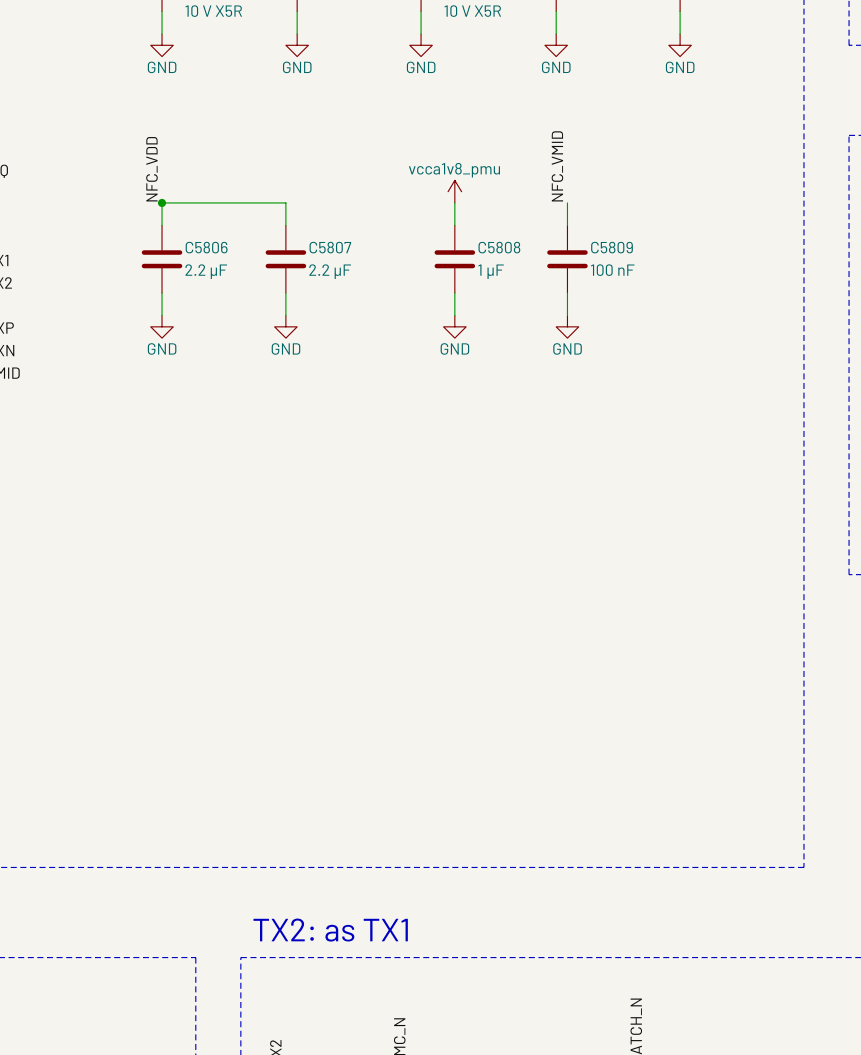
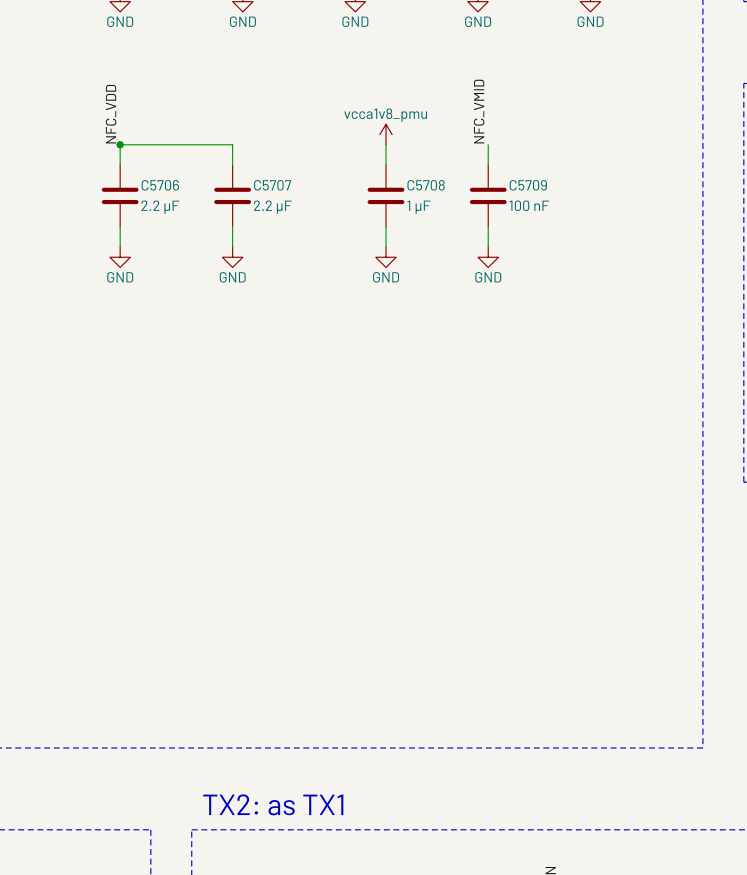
C5806 name: C5806 (206, 247) -> C5706 (160, 185)
C5807 name: C5807 (330, 247) -> C5707 (272, 185)
C5808 name: C5808 (499, 247) -> C5708 (426, 185)
C5809 name: C5809 (611, 247) -> C5709 (528, 185)

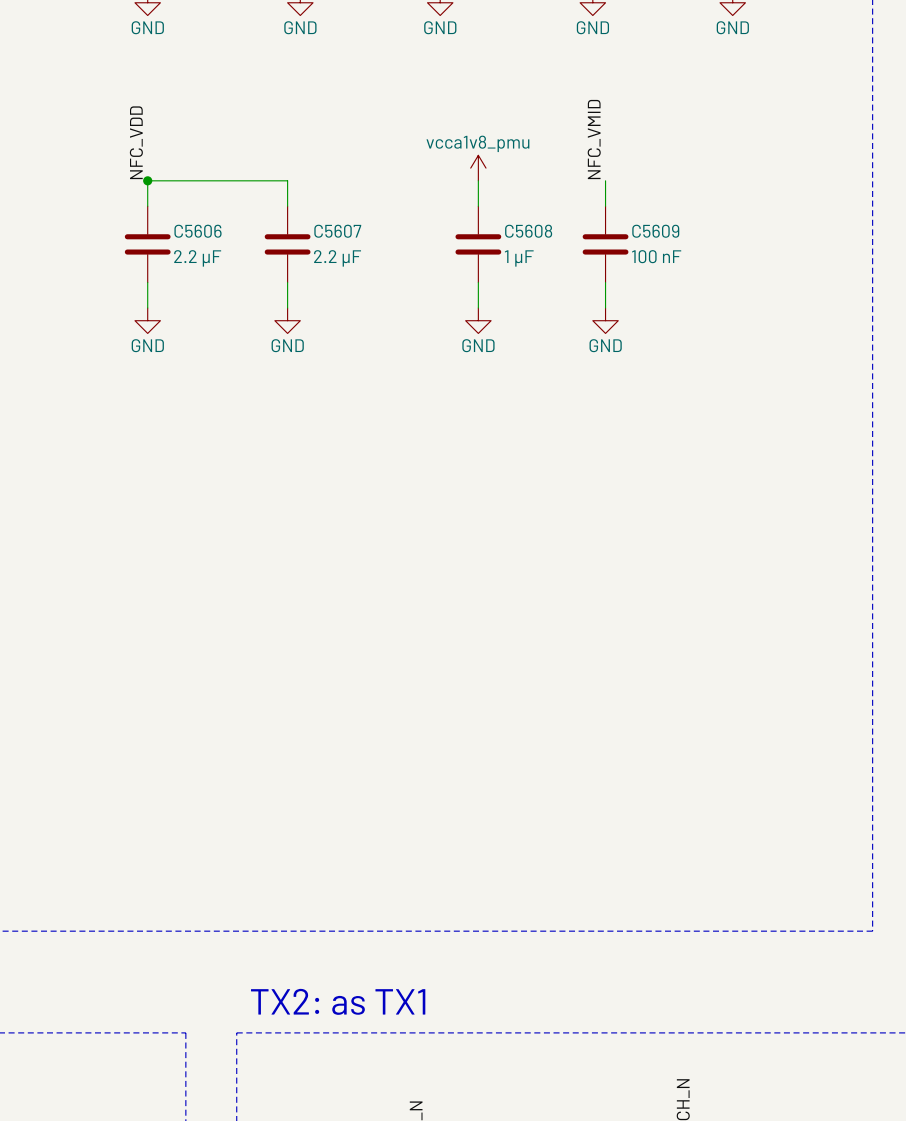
C5706 name: C5706 (160, 185) -> C5606 (198, 231)
C5707 name: C5707 (272, 185) -> C5607 (337, 231)
C5708 name: C5708 (426, 185) -> C5608 (528, 231)
C5709 name: C5709 (528, 185) -> C5609 (655, 231)

